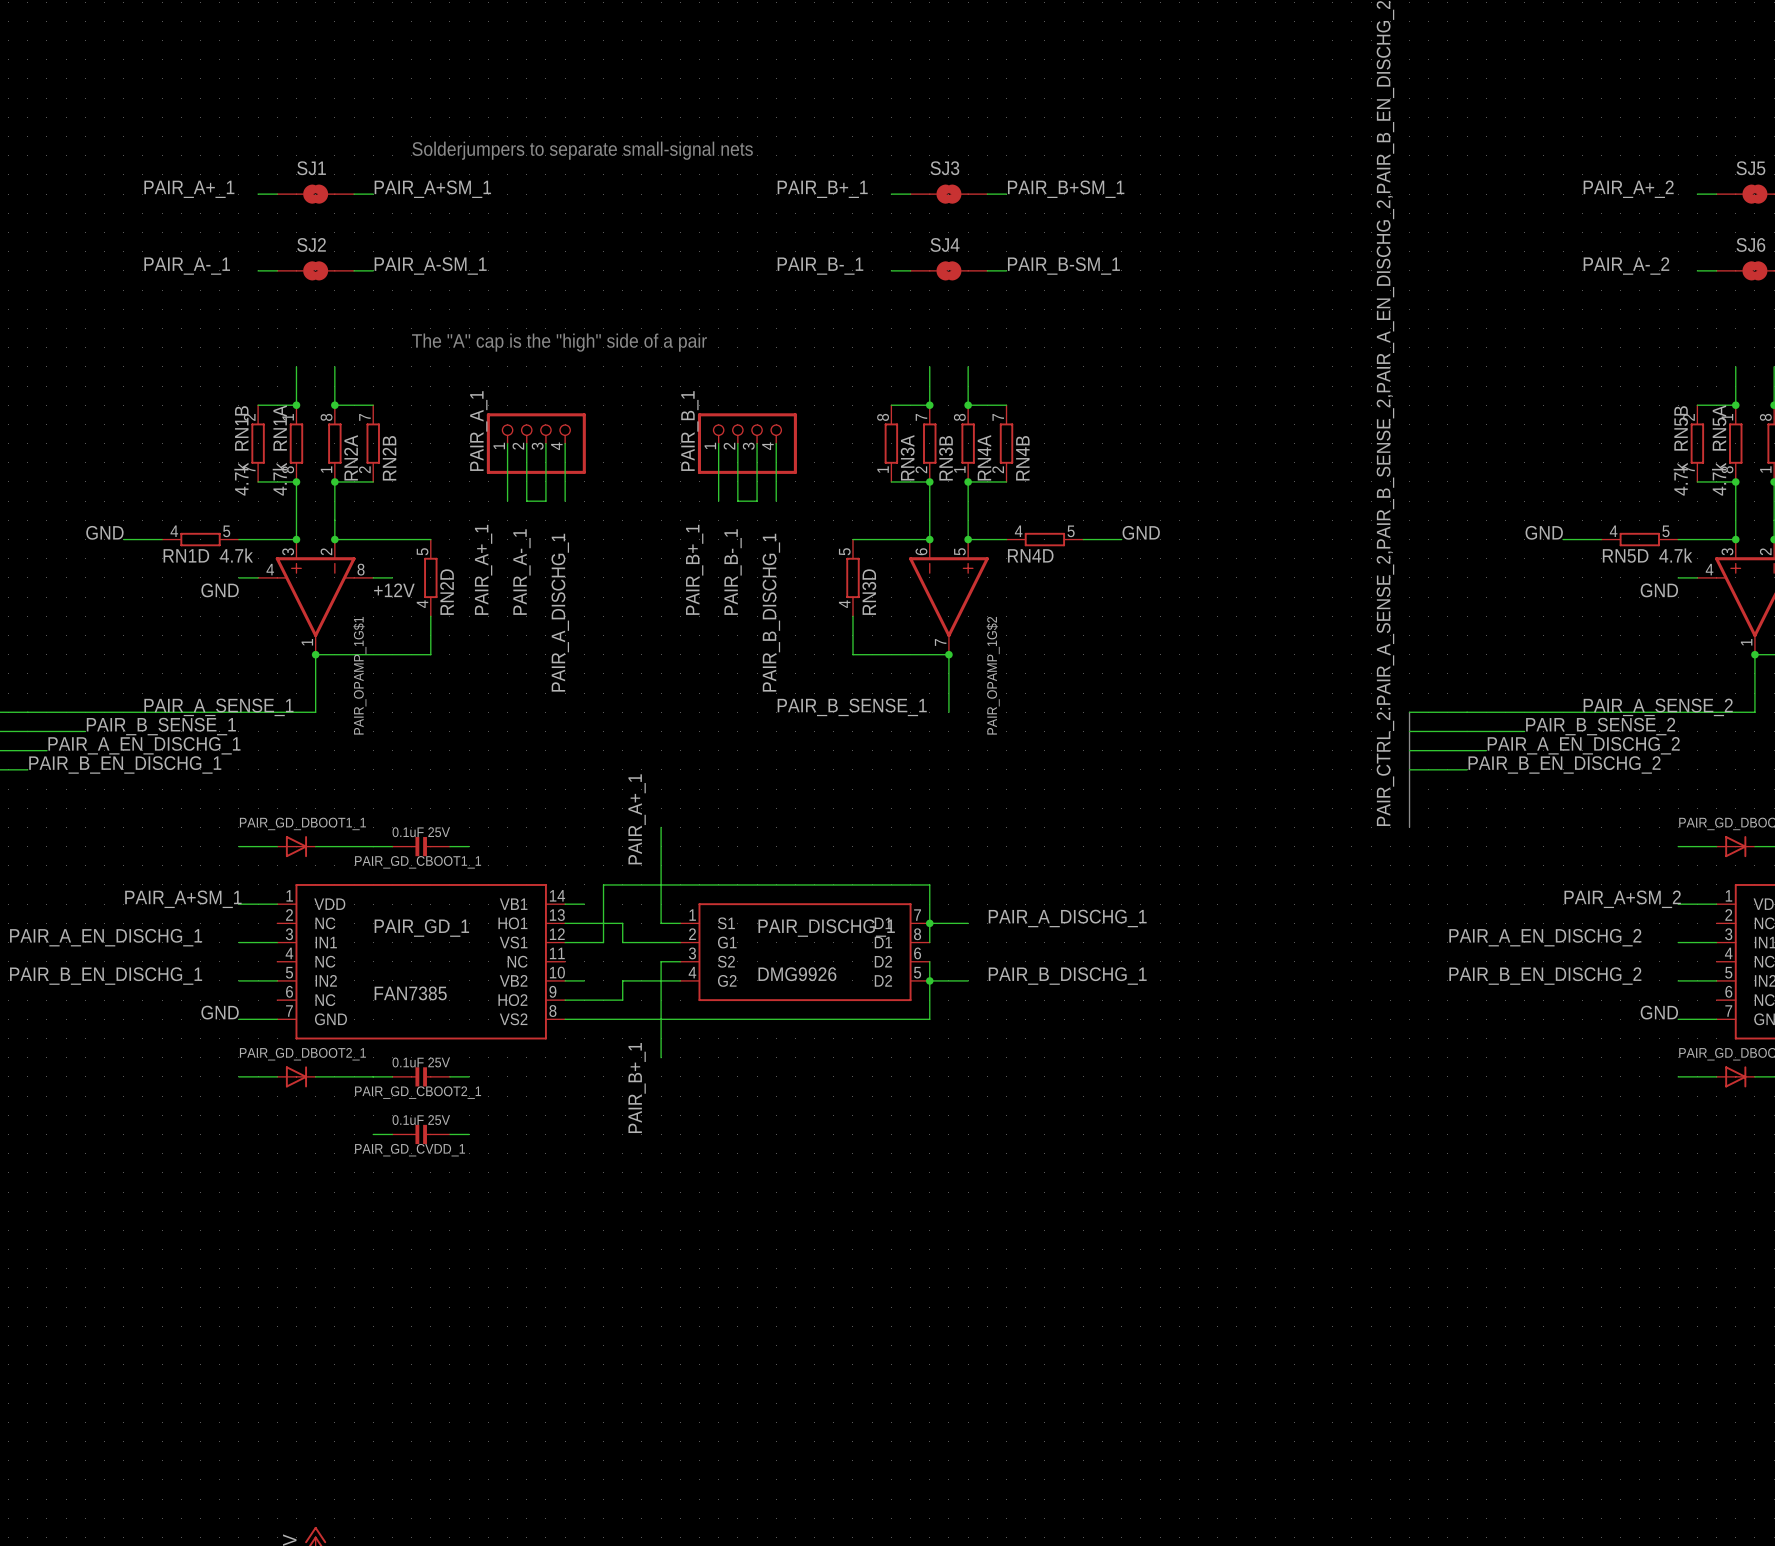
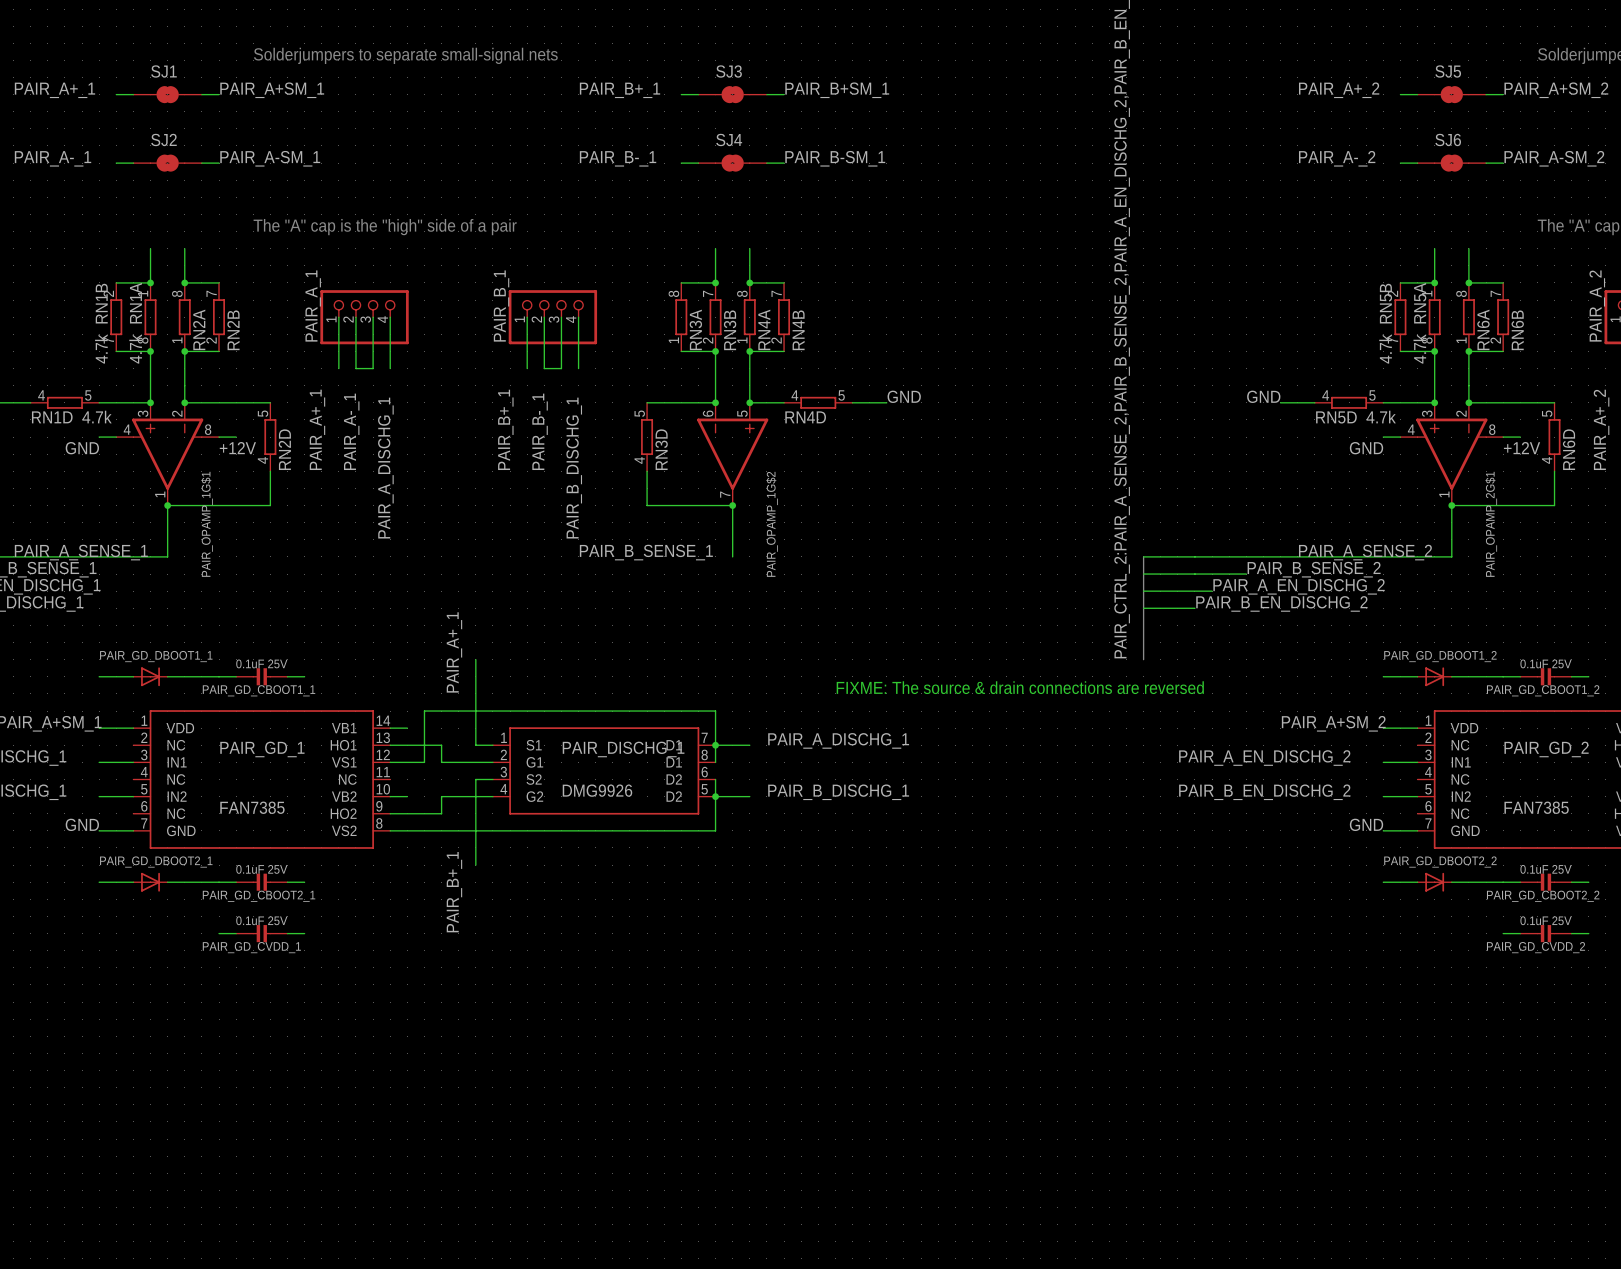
text: none -> FIXME: The source & drain connections are reversed (1020, 687)

